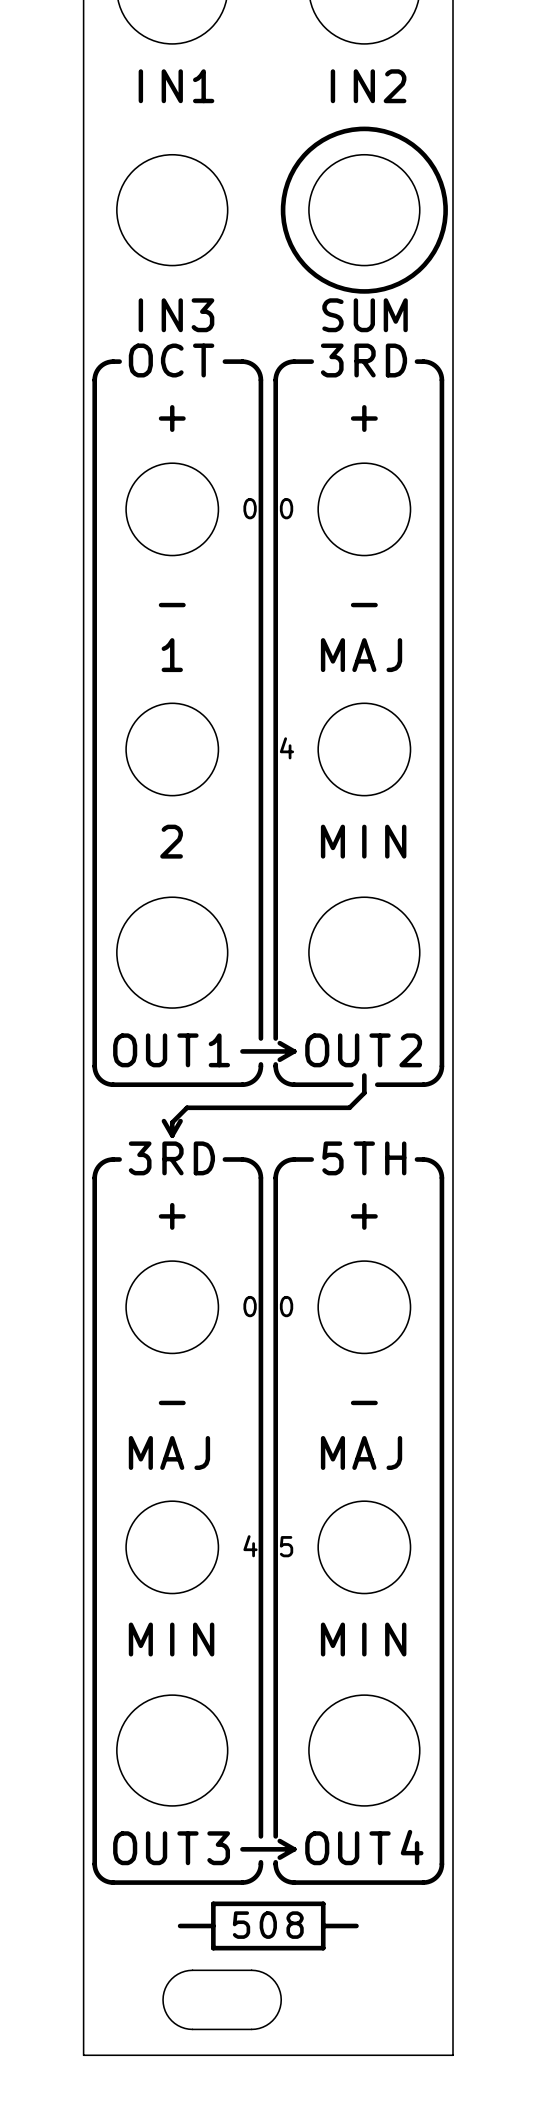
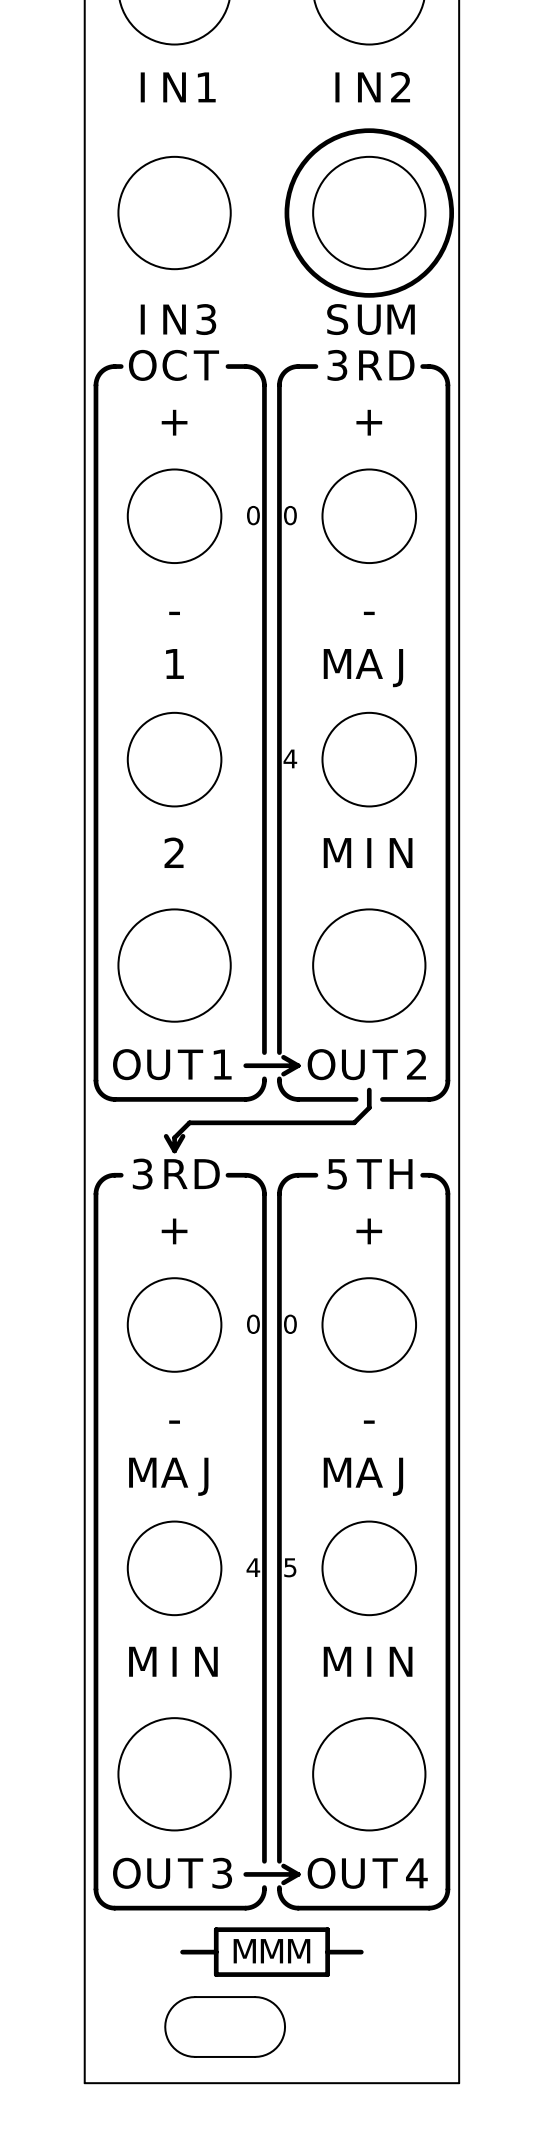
text: 5 (241, 1925) -> M (244, 1951)
text: 0 (268, 1925) -> M (271, 1951)
text: 8 (295, 1925) -> M (299, 1951)

